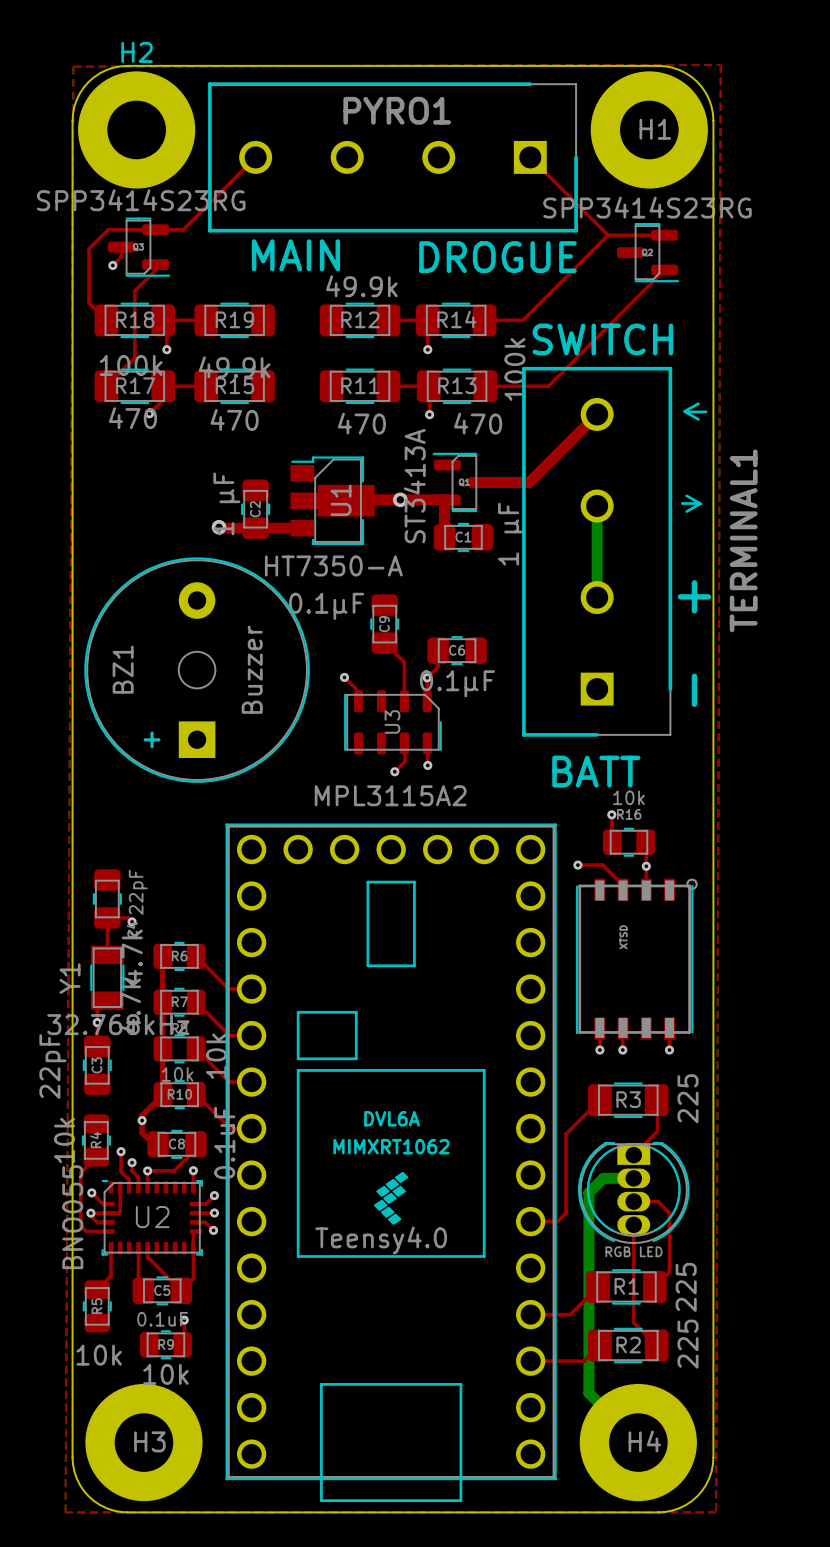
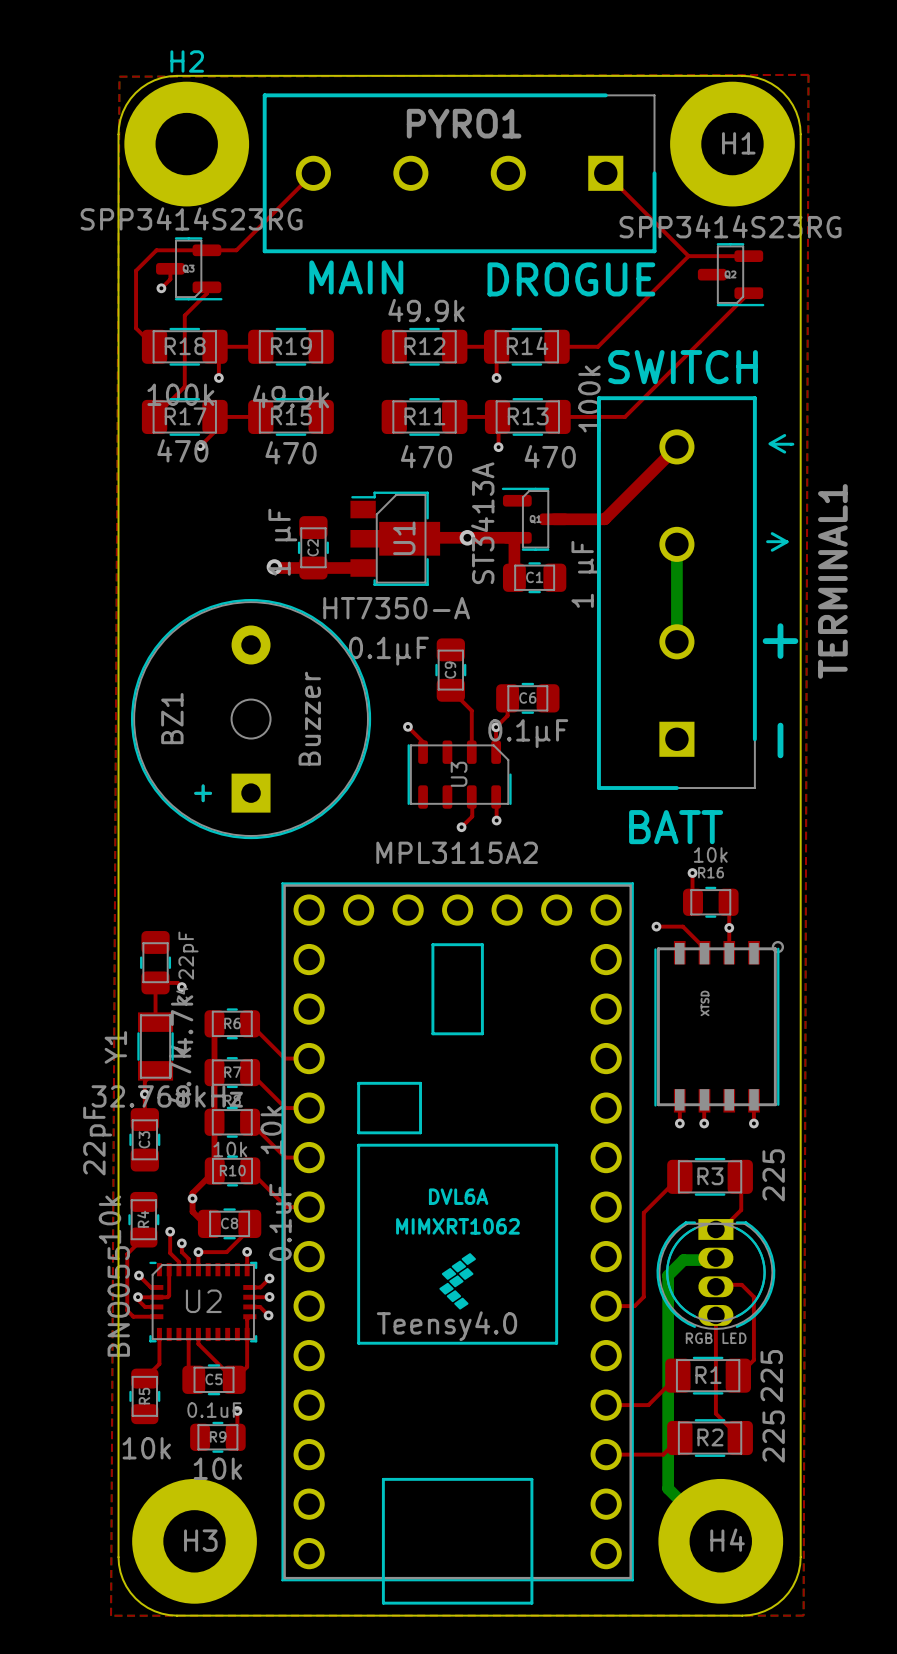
part footprint: [577, 1142, 690, 1245] -> [656, 1219, 776, 1330]

